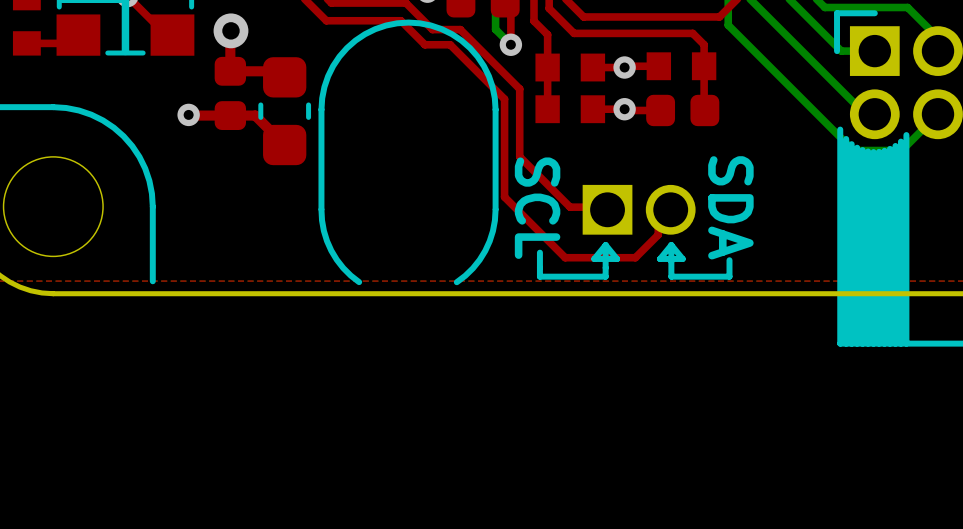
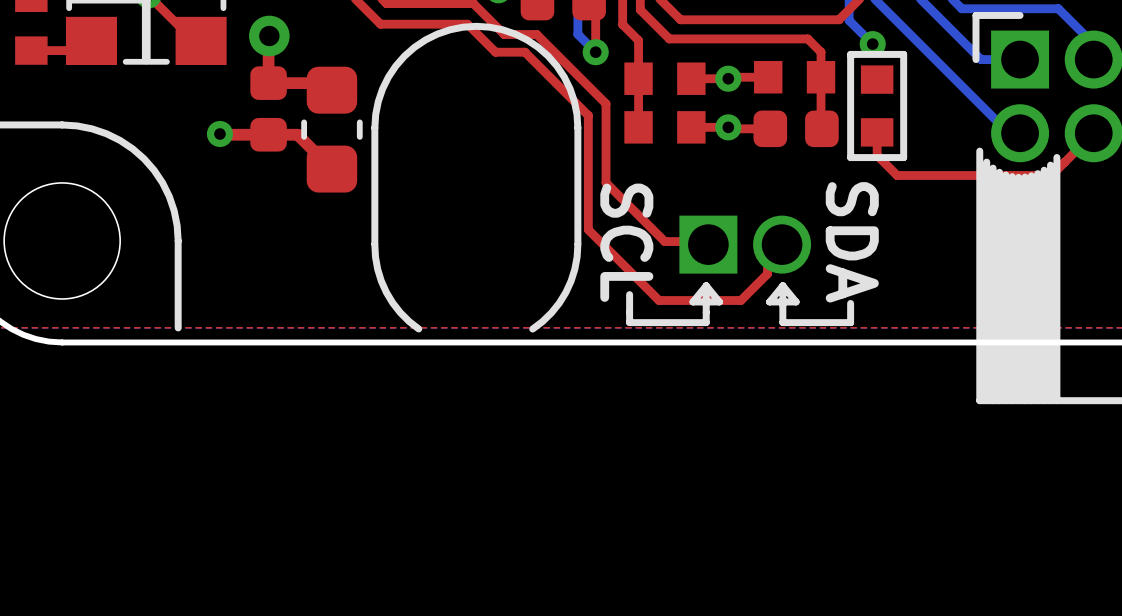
bottom track: (728, 17) (728, 25) (853, 150) (901, 150) (938, 114) -> (849, 20) (872, 44)
via: none -> (872, 44)
line: none -> (850, 54) (850, 157) (903, 157) (903, 54) (850, 54)
part: none -> (877, 106)
top track: none -> (877, 132) (877, 155) (897, 175) (1051, 175) (1093, 133)

